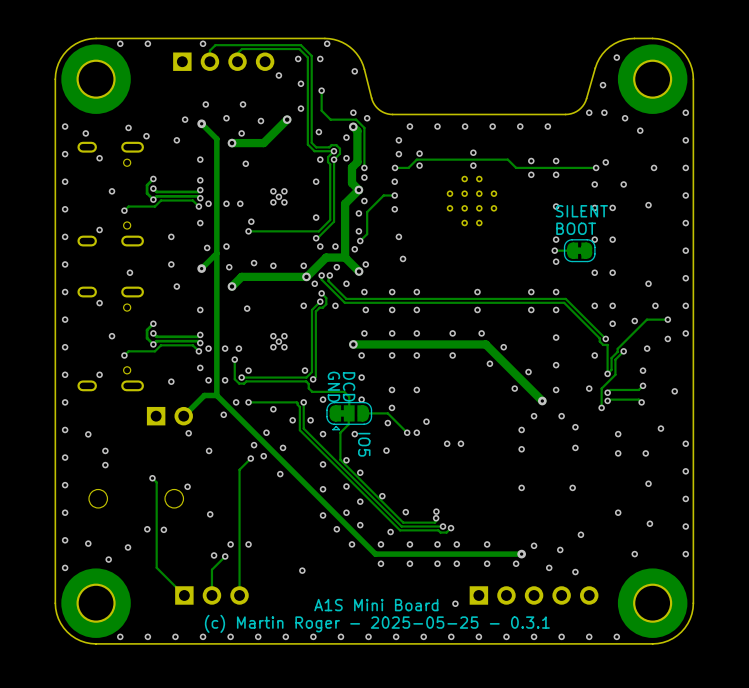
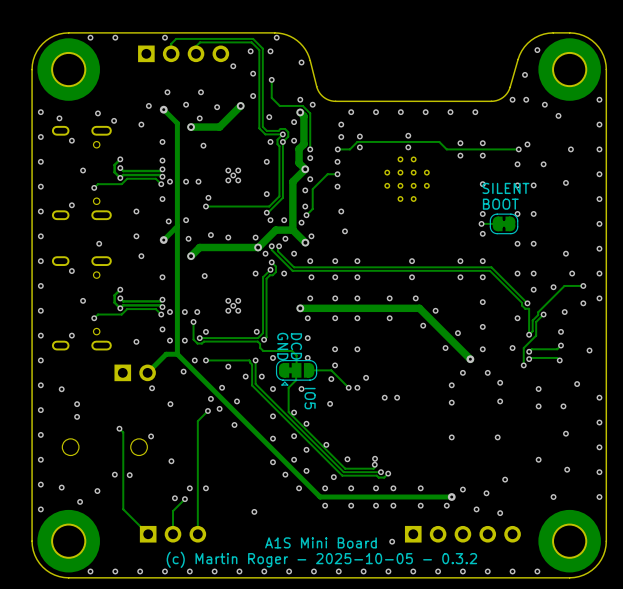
text: (c) Martin Roger - 2025-05-25 - 0.3.1 (377, 623) -> (c) Martin Roger - 2025-10-05 - 0.3.2 (321, 559)

